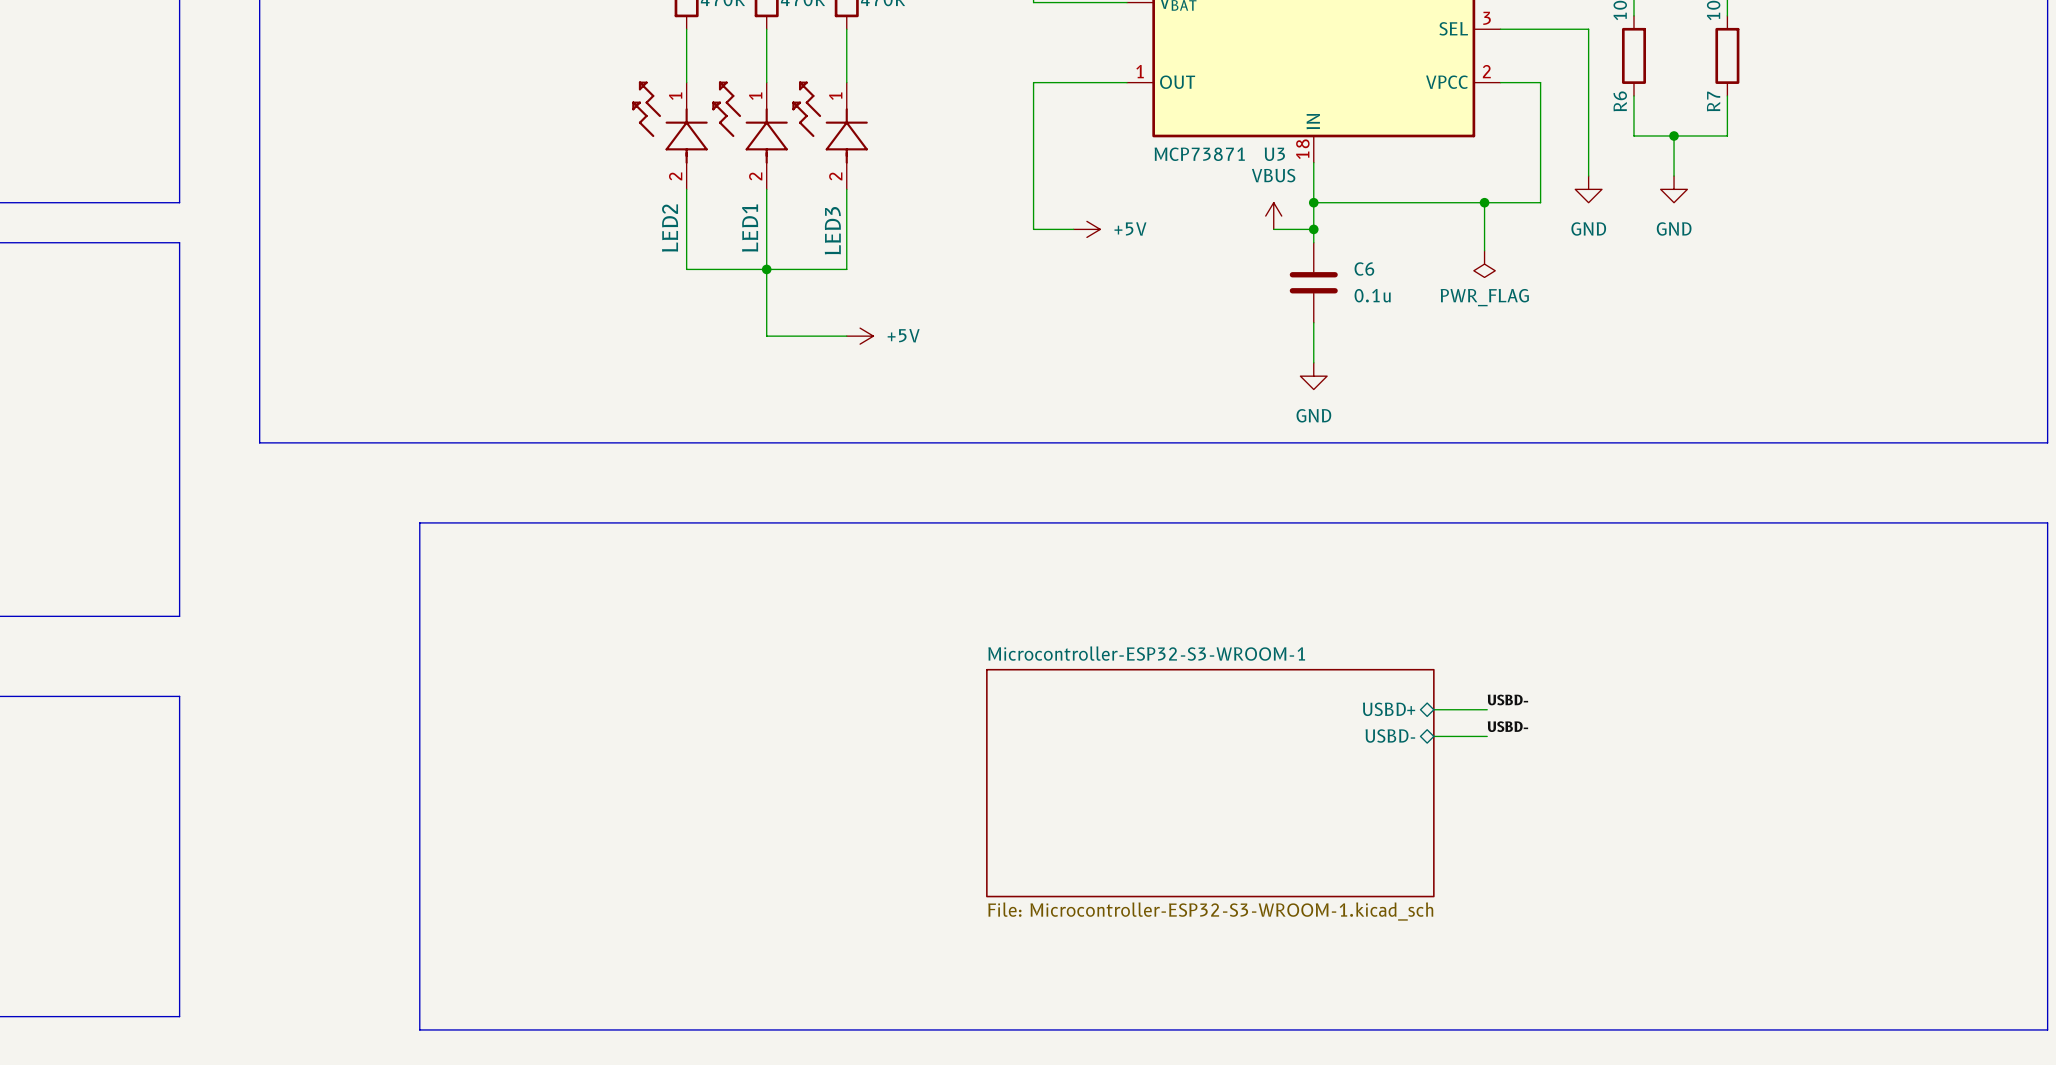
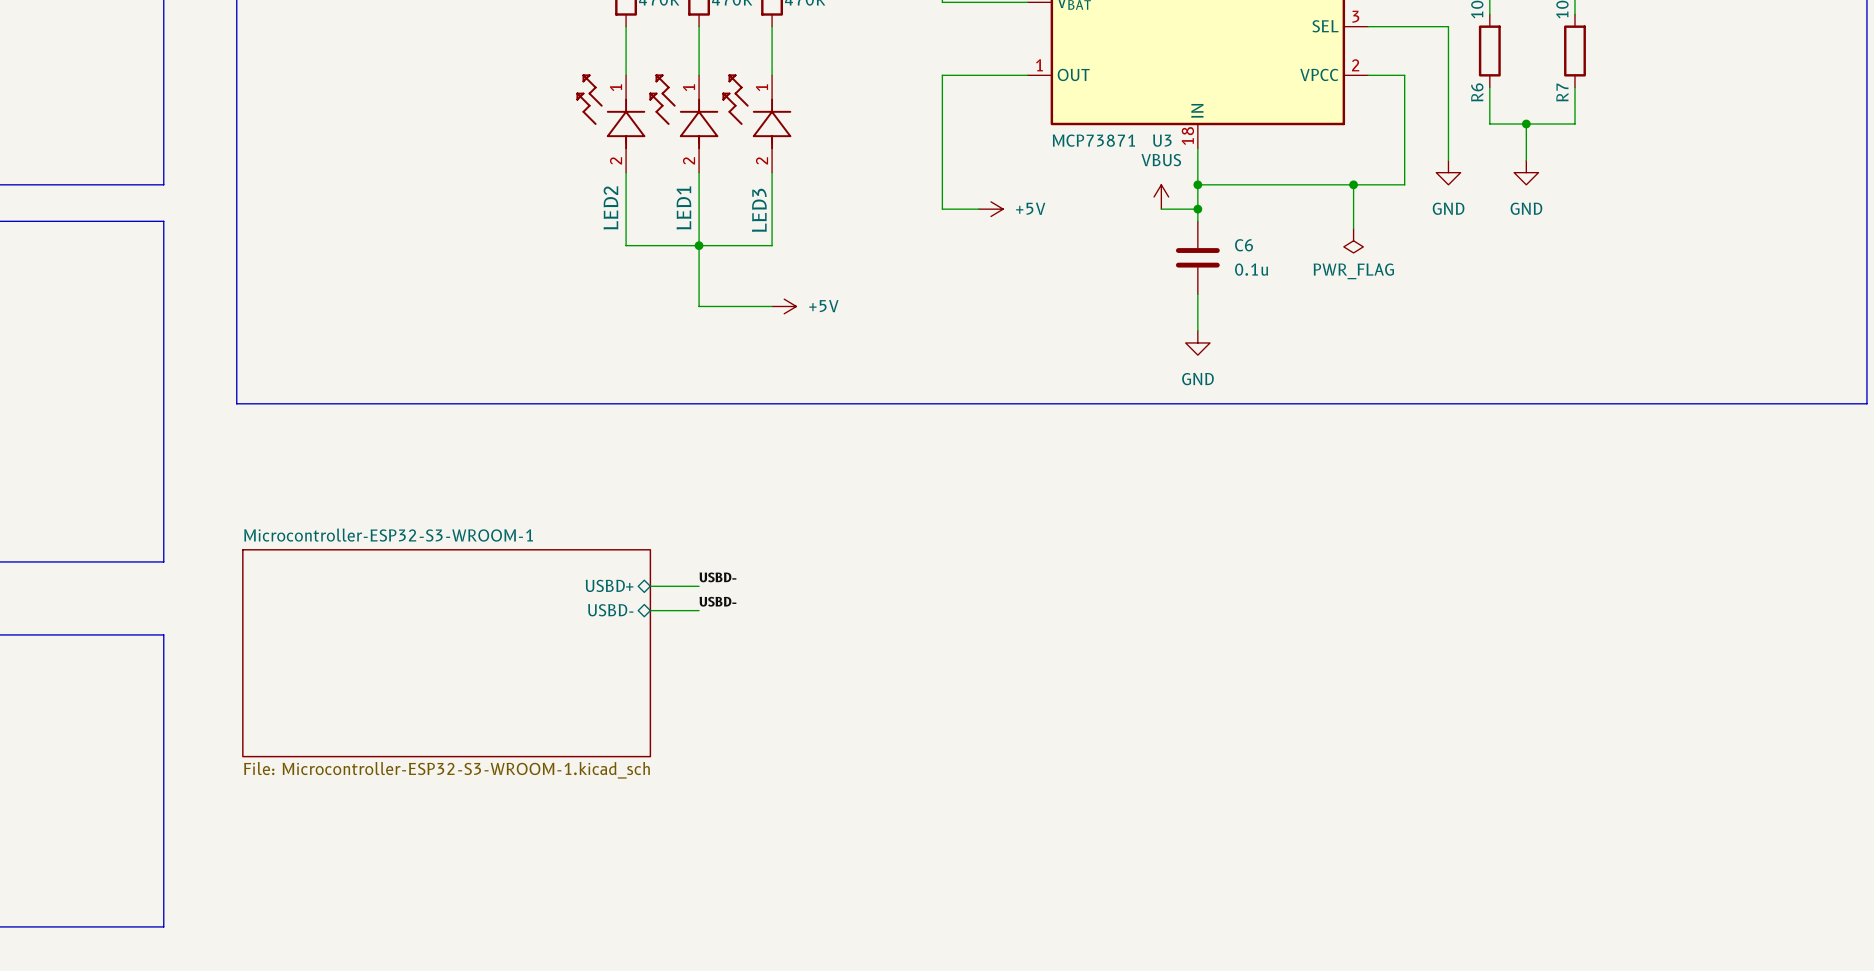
line: (419, 522) (2047, 522) (2047, 1029) (419, 1029) (419, 522) -> none
label: none -> USBD- (717, 577)
sheet pin: none -> USBD+ (609, 585)
wire: none -> (650, 586) (699, 586)
label: none -> USBD- (717, 601)
sheet pin: none -> USBD- (610, 610)
wire: none -> (650, 610) (699, 610)
label: USBD- (1507, 699) -> none
sheet pin: USBD+ (1389, 709) -> none
wire: (1433, 709) (1487, 709) -> none
label: USBD- (1507, 726) -> none
sheet pin: USBD- (1390, 736) -> none
wire: (1433, 736) (1487, 736) -> none
sheet Microcontroller-ESP32-S3-WROOM-1 position: (1210, 783) -> (446, 653)

